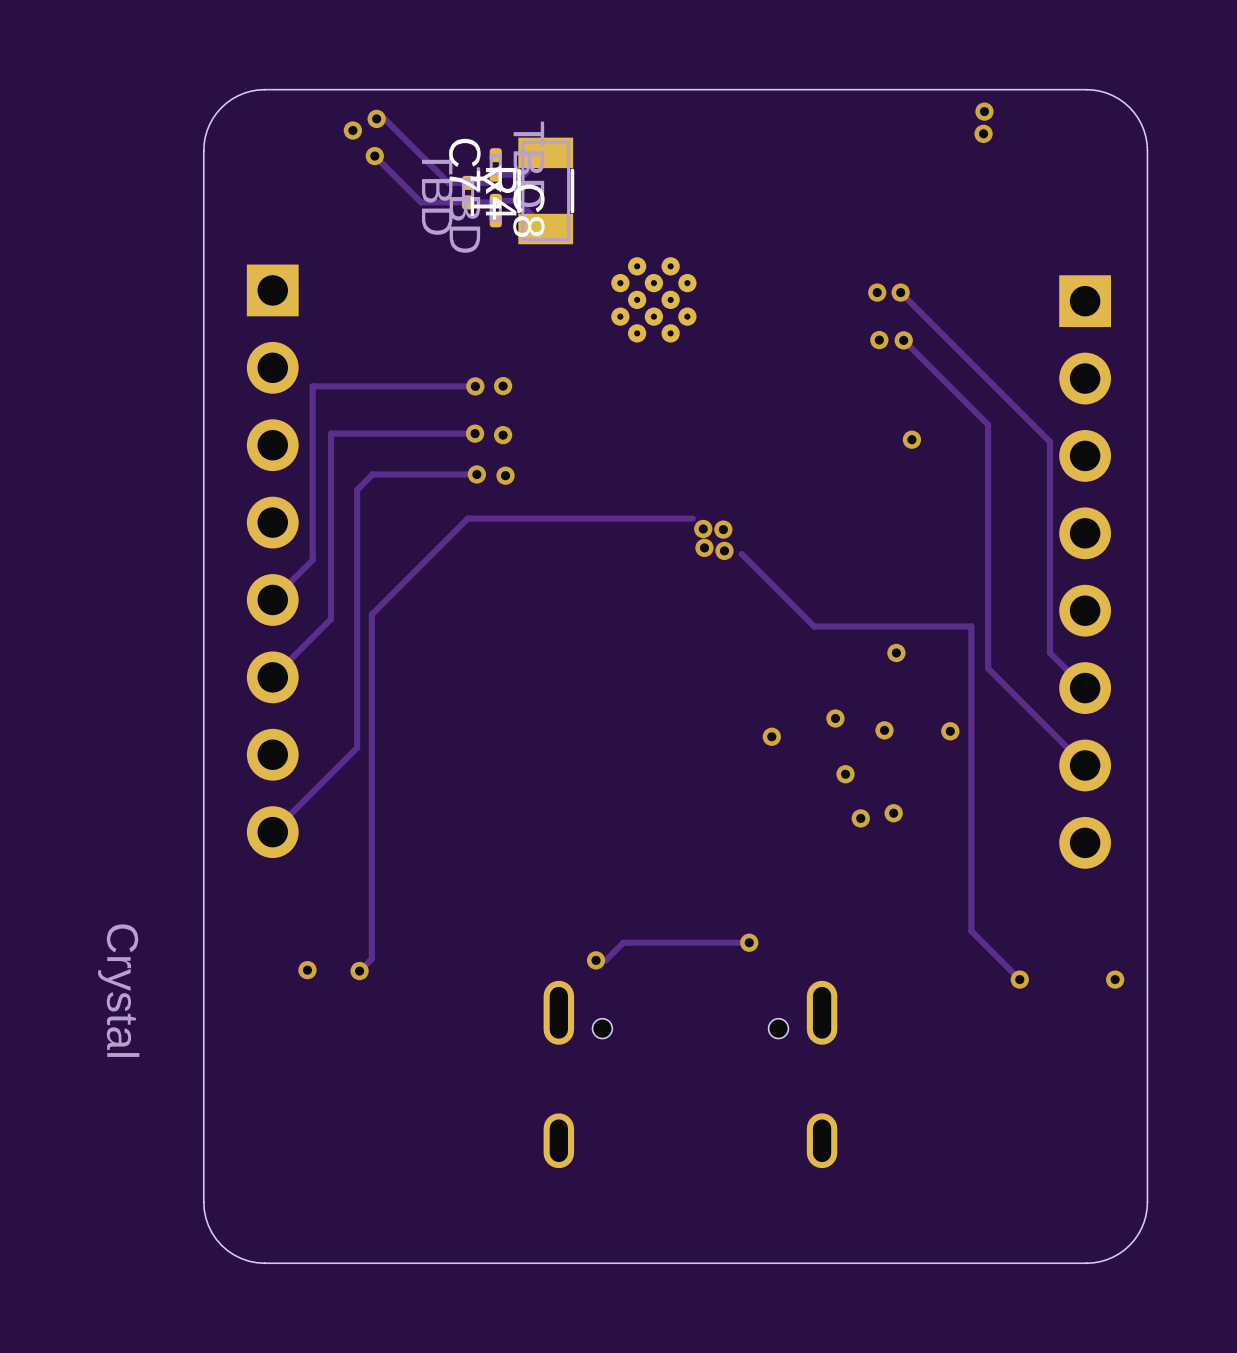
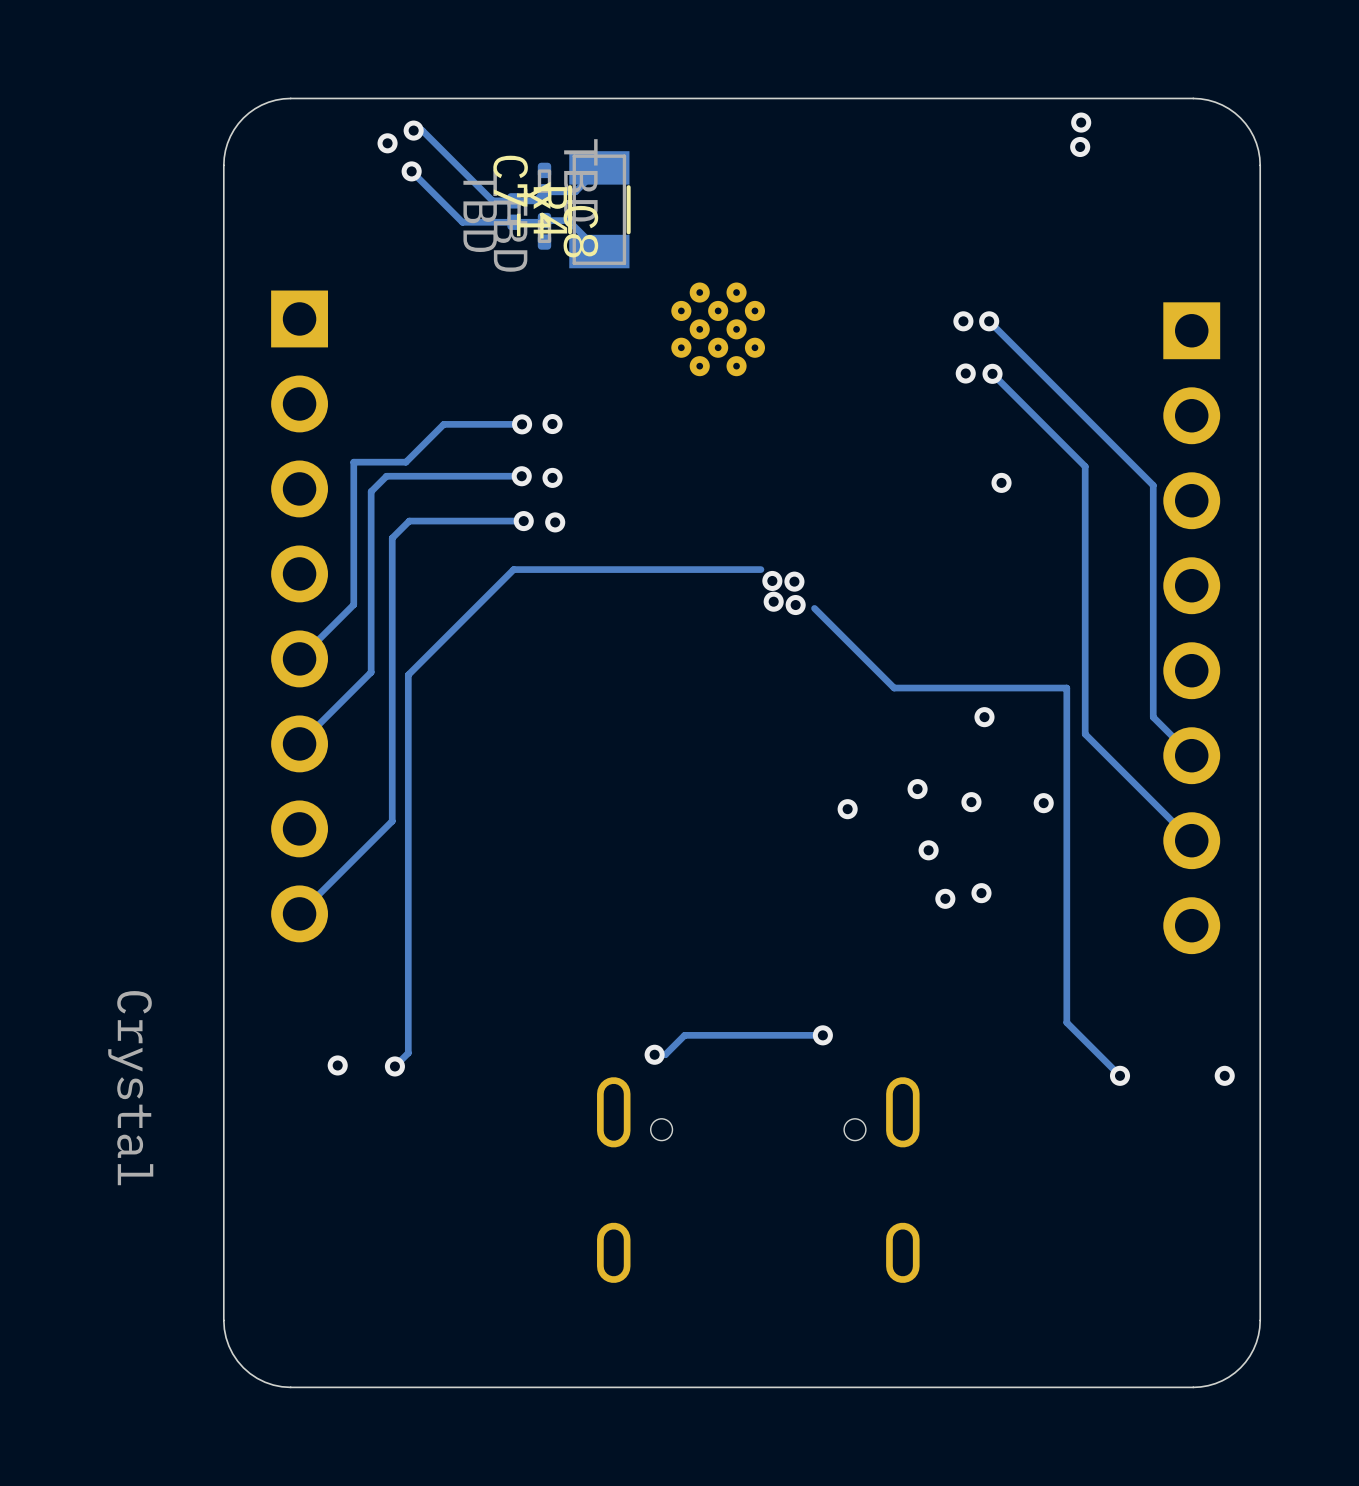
track: (404, 386) (312, 386) (312, 560) -> (443, 424) (405, 462) (353, 462) (353, 604) (343, 615)
track: (351, 433) (330, 433) (330, 619) -> (386, 476) (371, 491) (371, 672) (363, 680)

